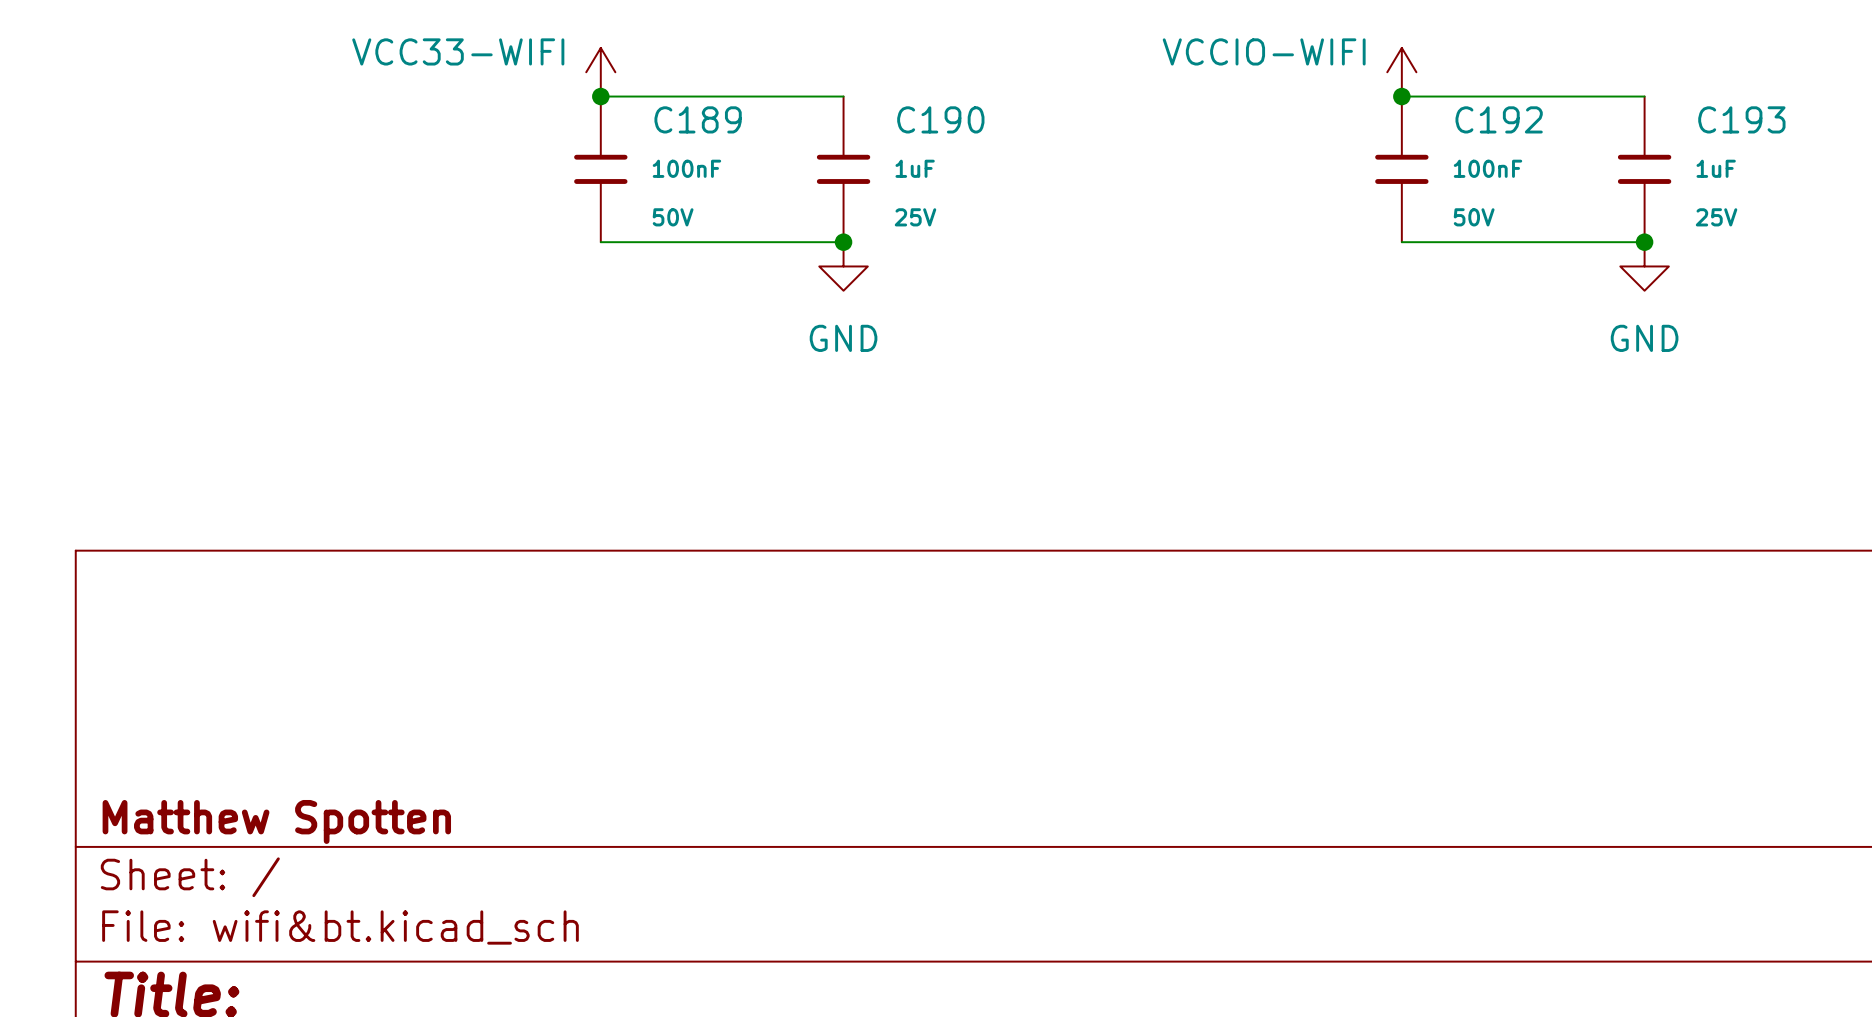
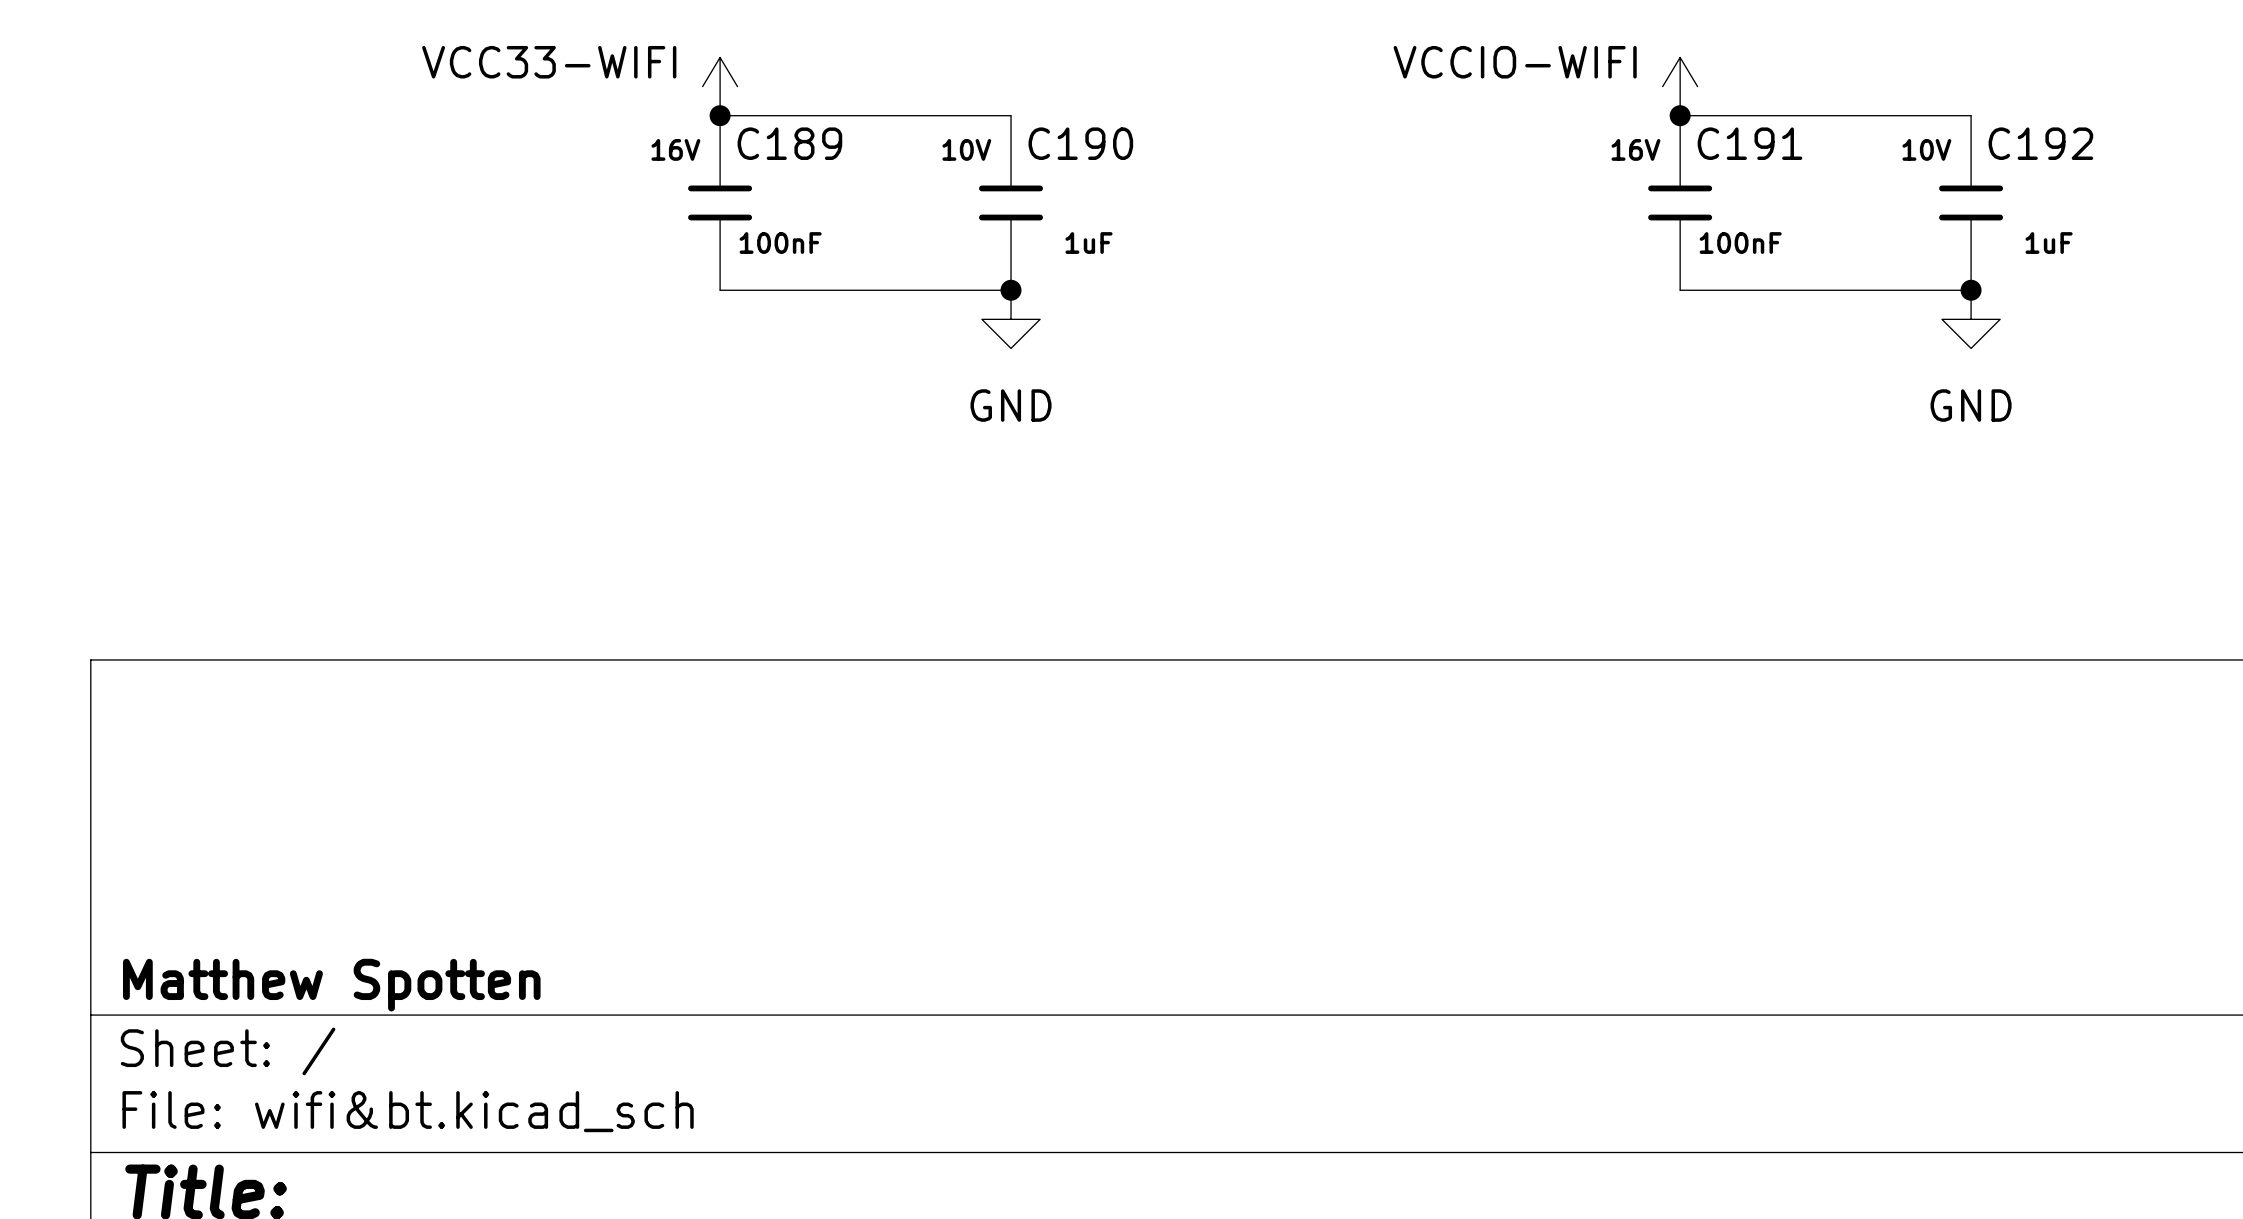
C189 name position: C189 (698, 119) -> C189 (789, 143)
C190 name position: C190 (940, 119) -> C190 (1080, 143)
C192 name: C192 (1499, 119) -> C191 (1749, 143)
C193 name: C193 (1741, 119) -> C192 (2040, 143)
C189 value position: 100nF (686, 168) -> 100nF (780, 243)
C190 value position: 1uF (915, 168) -> 1uF (1089, 243)
C192 value position: 100nF (1487, 168) -> 100nF (1740, 243)
C193 value position: 1uF (1716, 168) -> 1uF (2049, 243)
C189 text: 50V (673, 217) -> 16V (675, 149)
C190 text: 25V (915, 217) -> 10V (966, 149)
C192 text: 50V (1474, 217) -> 16V (1635, 149)
C193 text: 25V (1716, 217) -> 10V (1926, 149)

